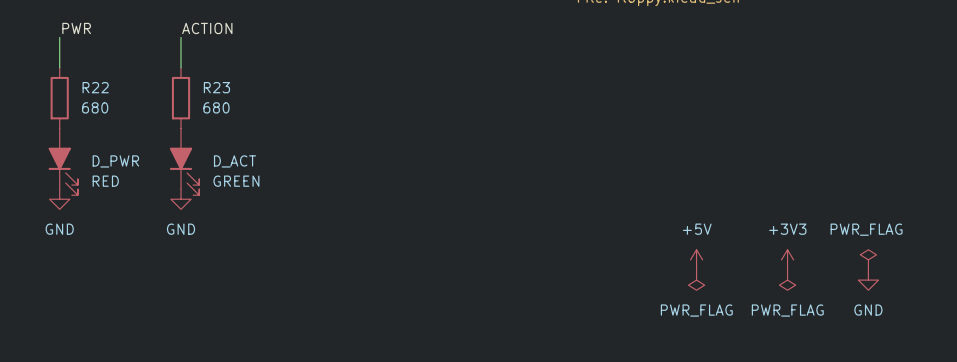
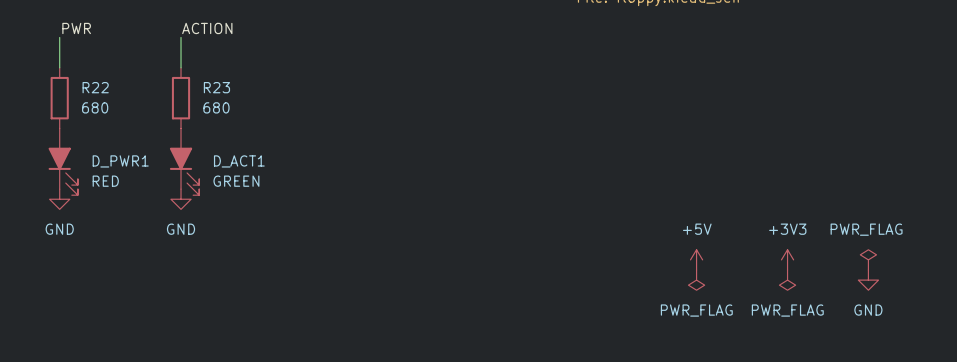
D_PWR name: D_PWR (115, 161) -> D_PWR1 (120, 161)
D_ACT name: D_ACT (235, 161) -> D_ACT1 (239, 161)

